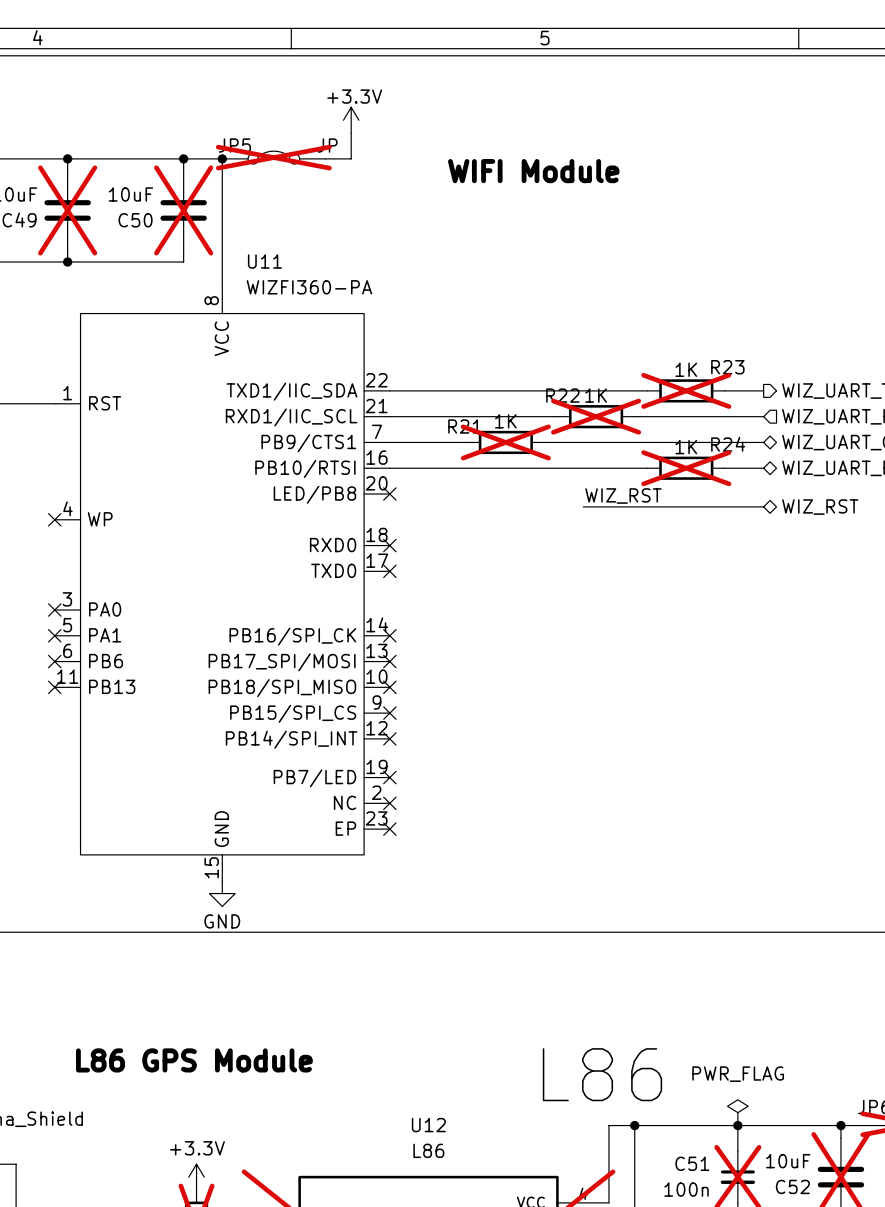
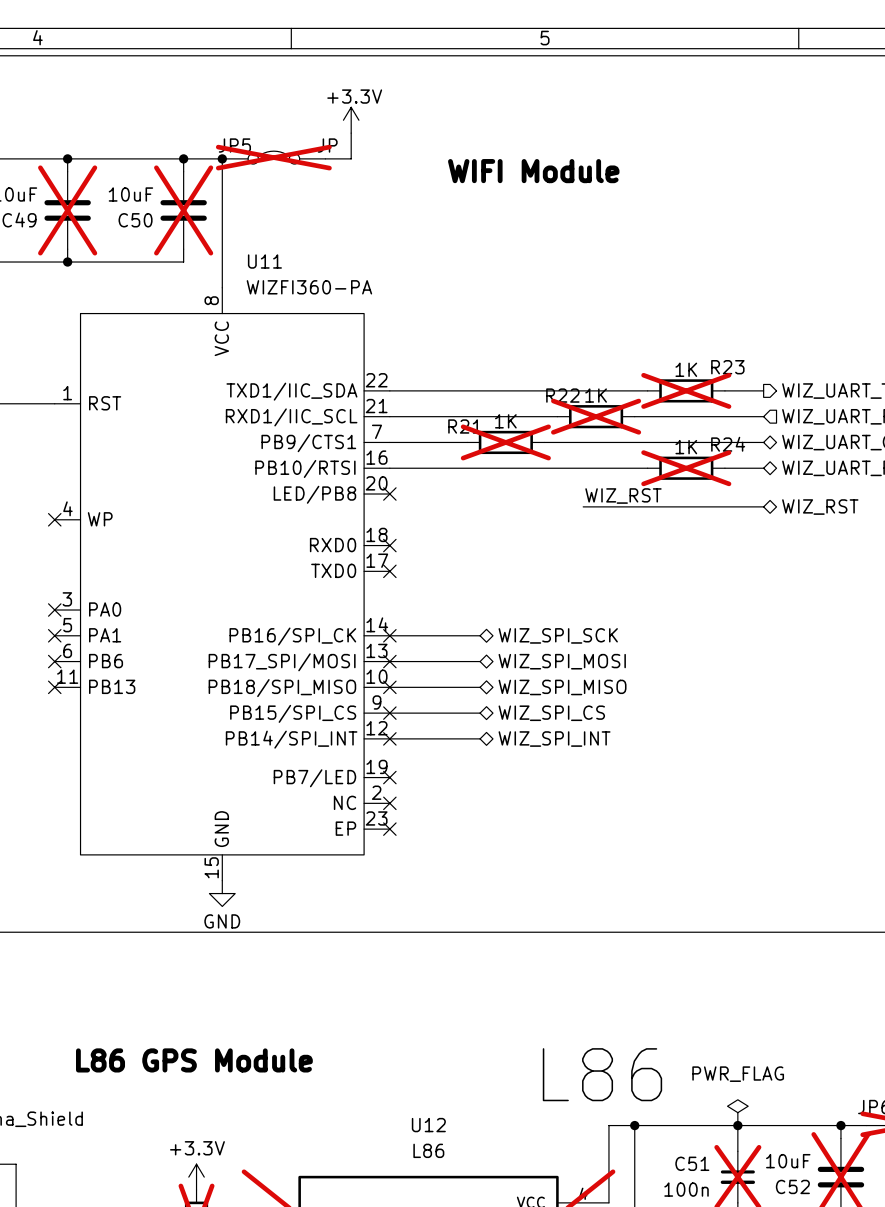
wire: none -> (389, 635) (480, 635)
hierarchical label: none -> WIZ_SPI_SCK (558, 635)
wire: none -> (389, 661) (480, 661)
hierarchical label: none -> WIZ_SPI_MOSI (562, 661)
wire: none -> (389, 687) (480, 687)
hierarchical label: none -> WIZ_SPI_MISO (562, 687)
wire: none -> (389, 713) (480, 713)
hierarchical label: none -> WIZ_SPI_CS (551, 713)
wire: none -> (389, 738) (480, 738)
hierarchical label: none -> WIZ_SPI_INT (554, 739)

